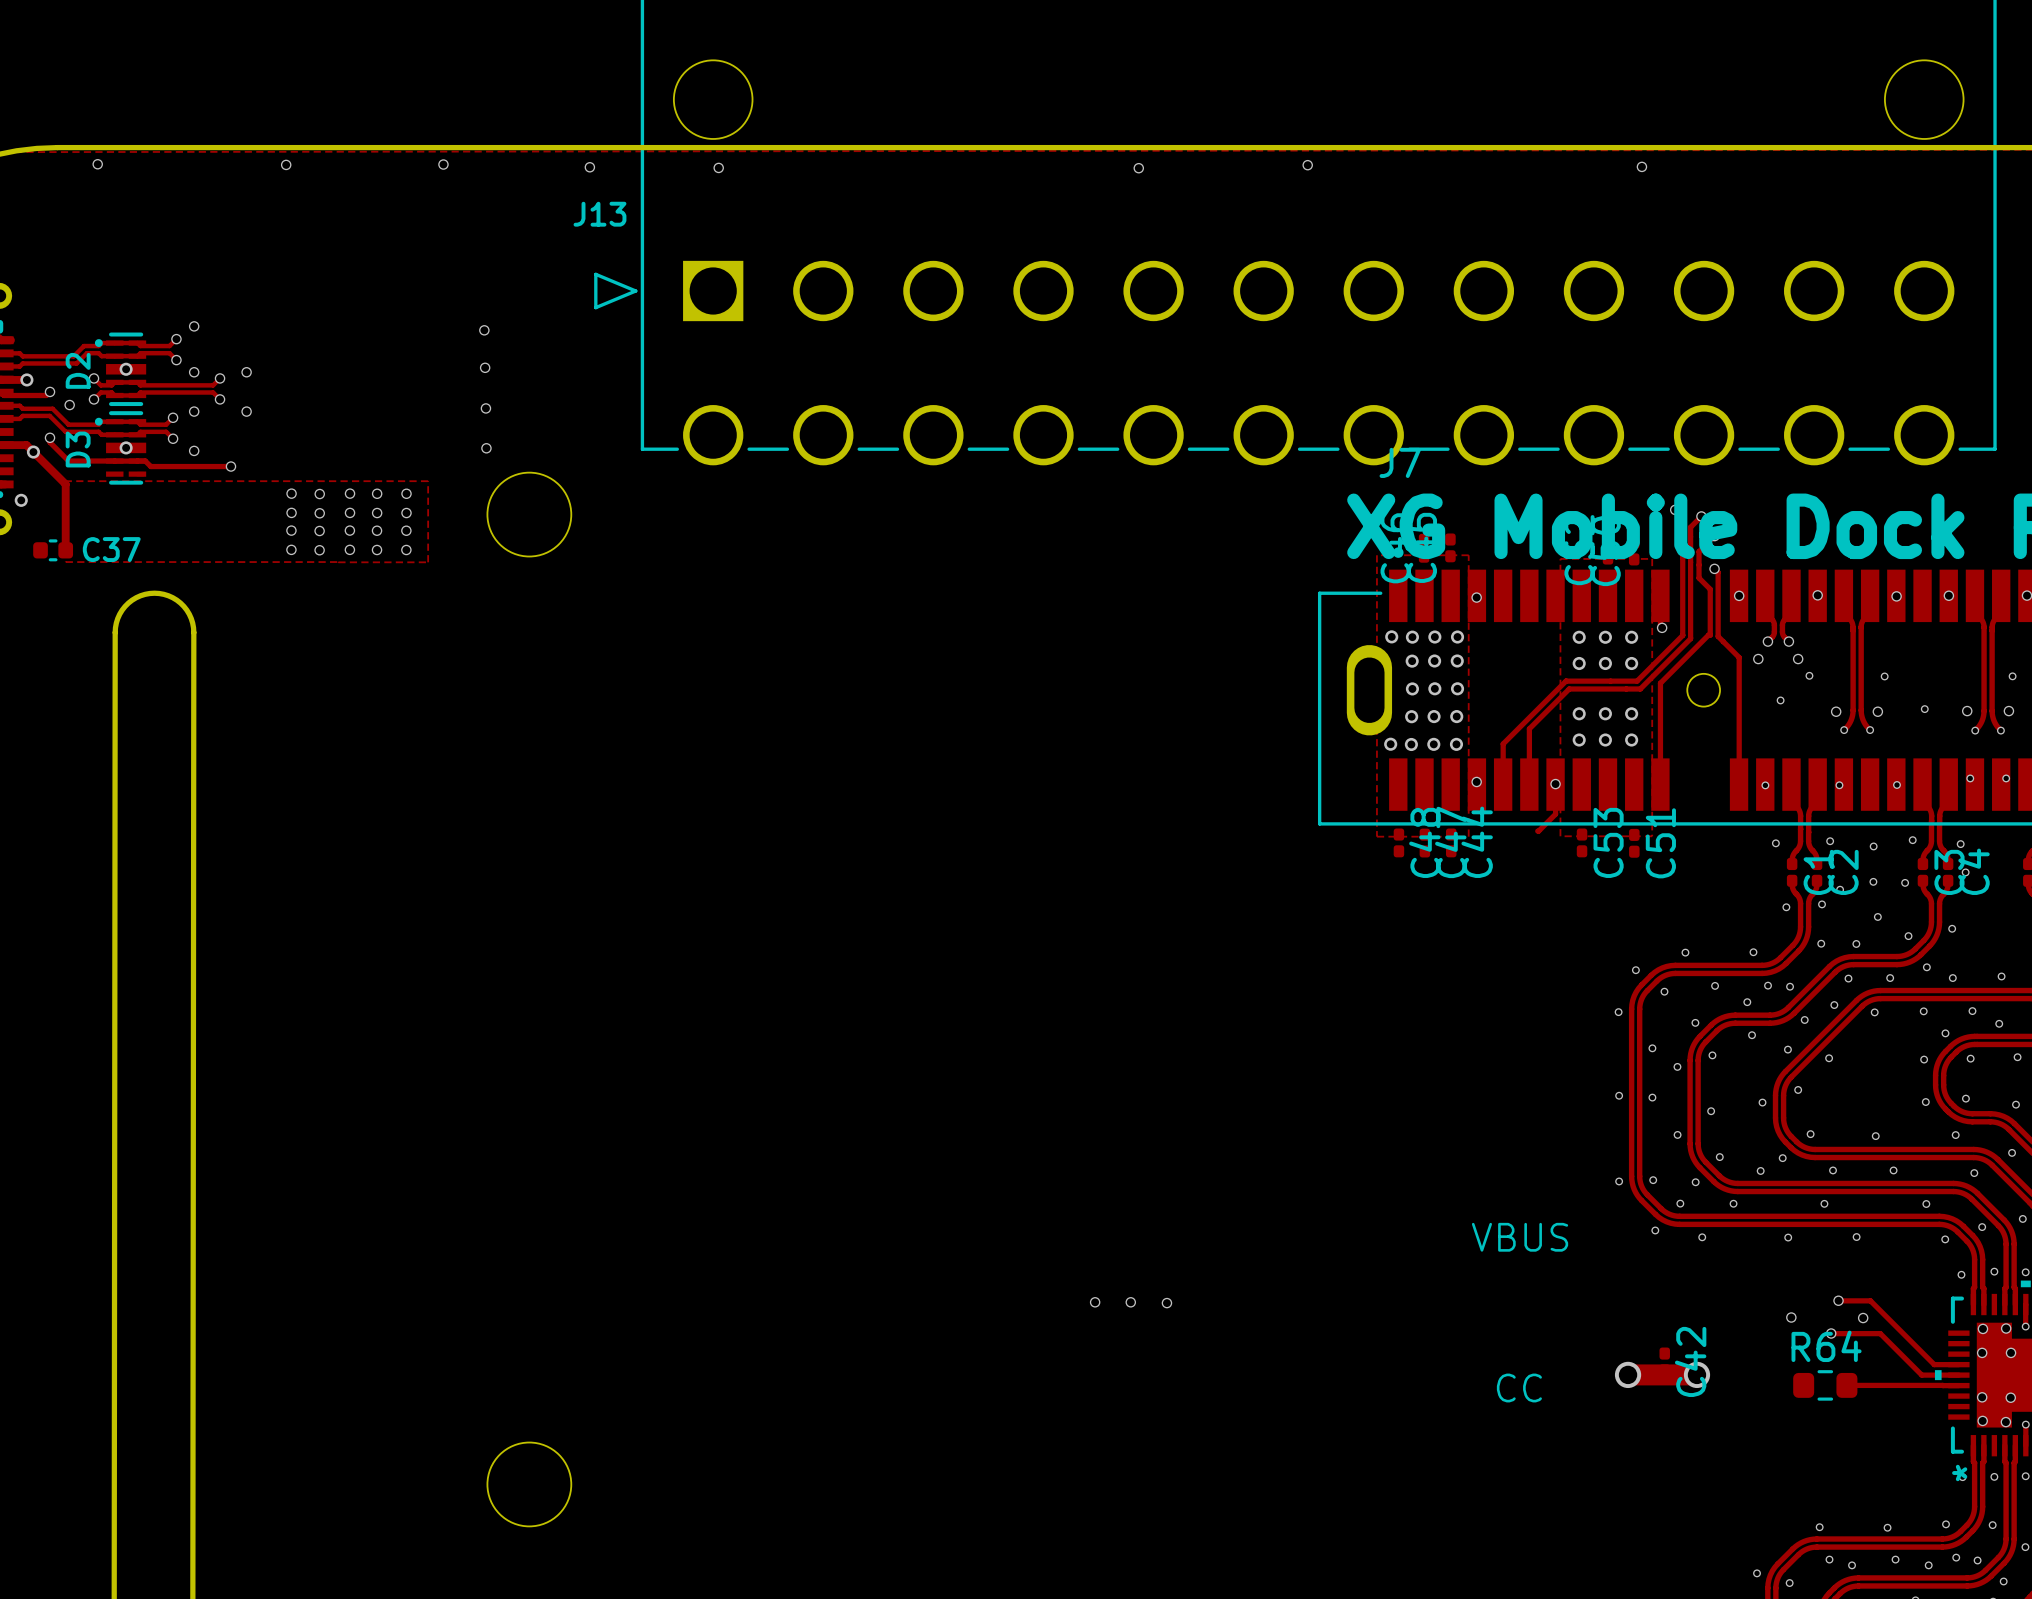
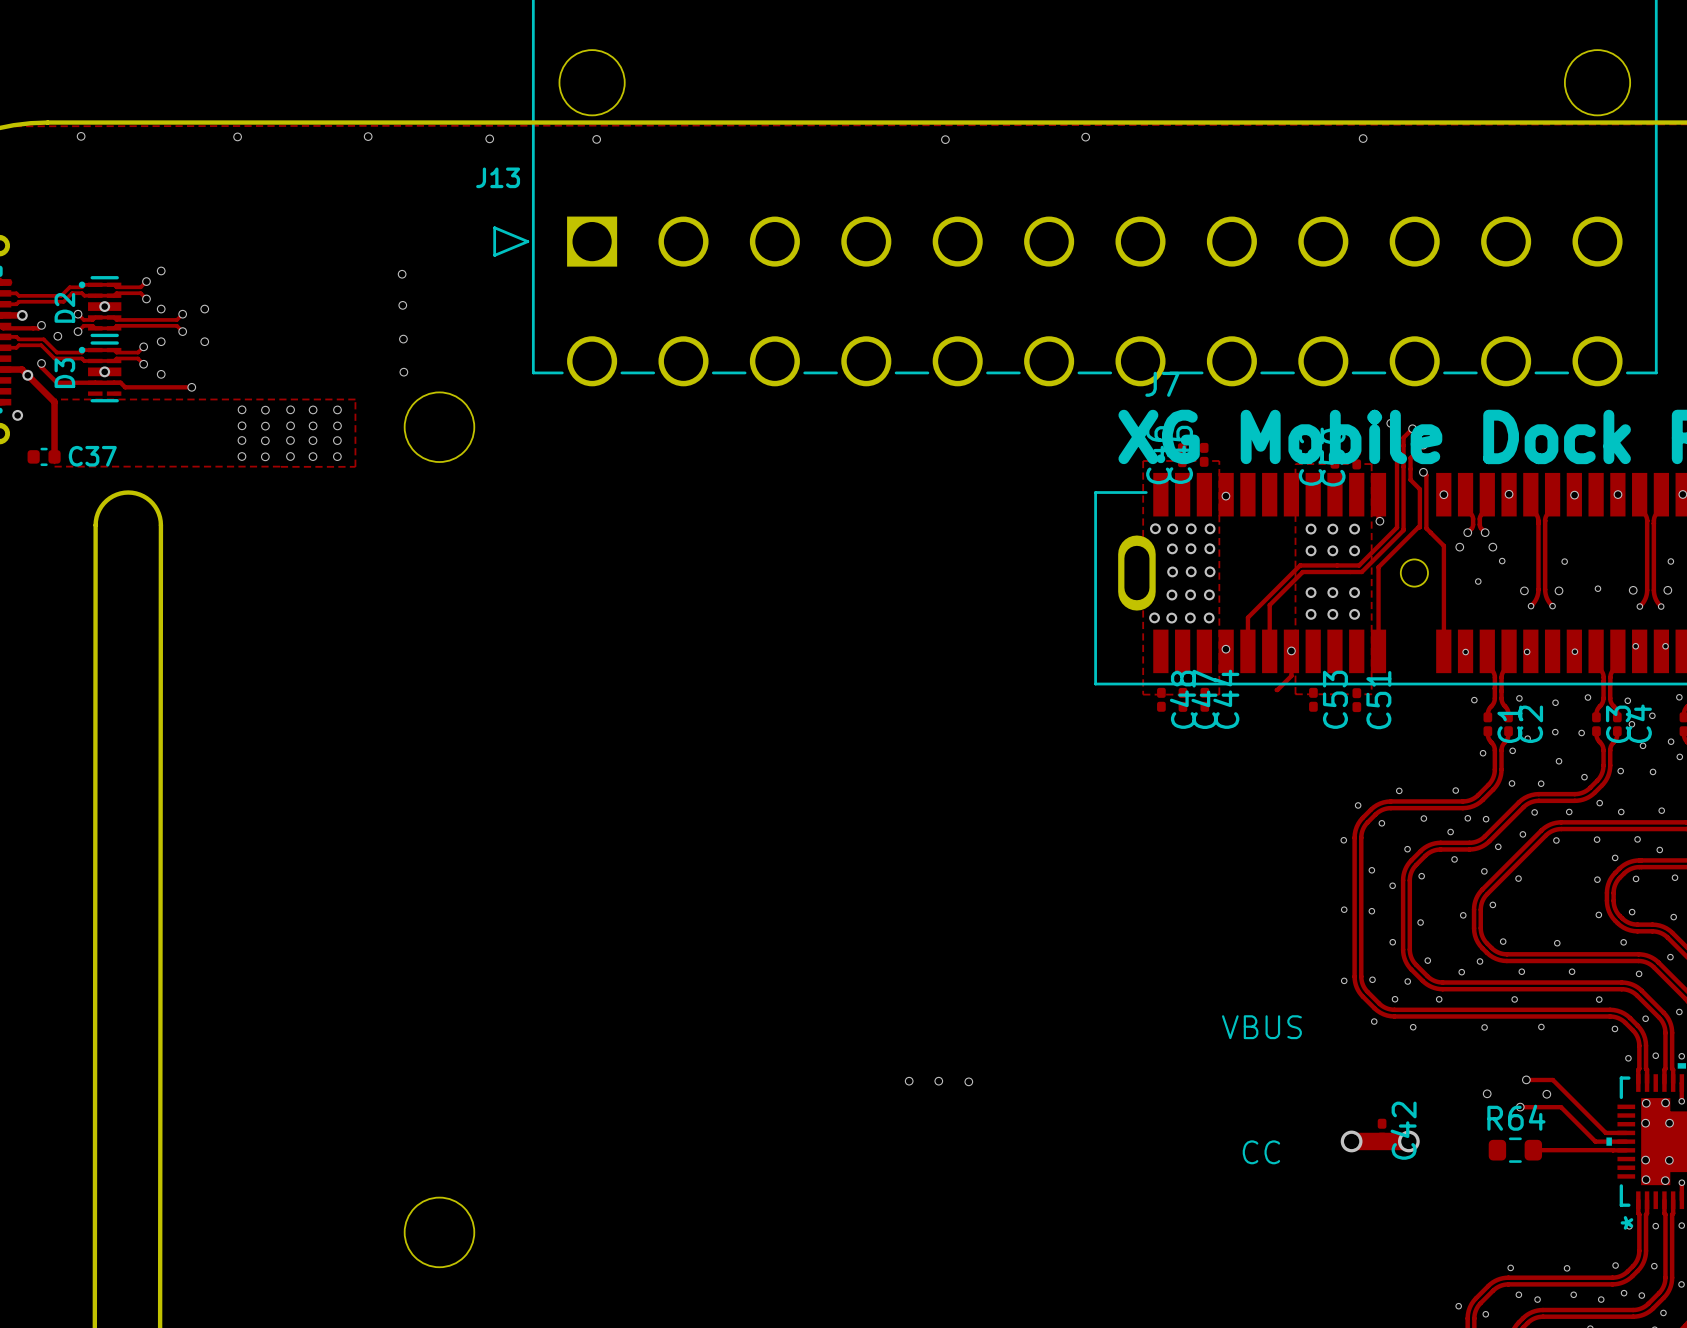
via: none -> (1679, 697)
via: none -> (1652, 715)
via: none -> (1671, 741)
via: none -> (1643, 745)
via: none -> (1679, 756)
via: none -> (1653, 771)

